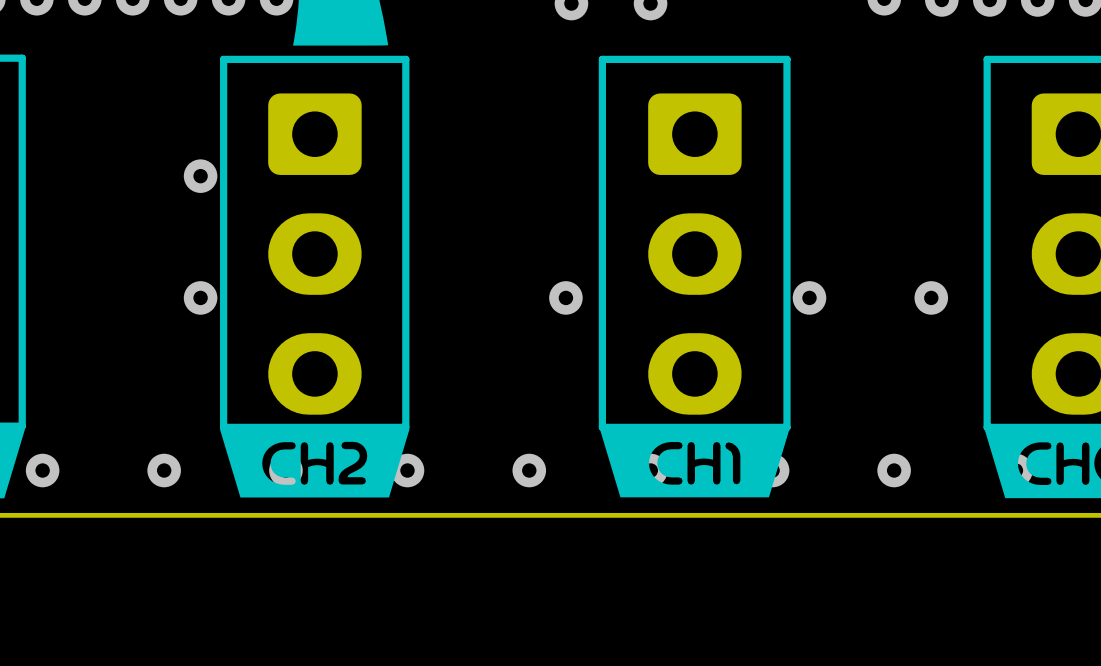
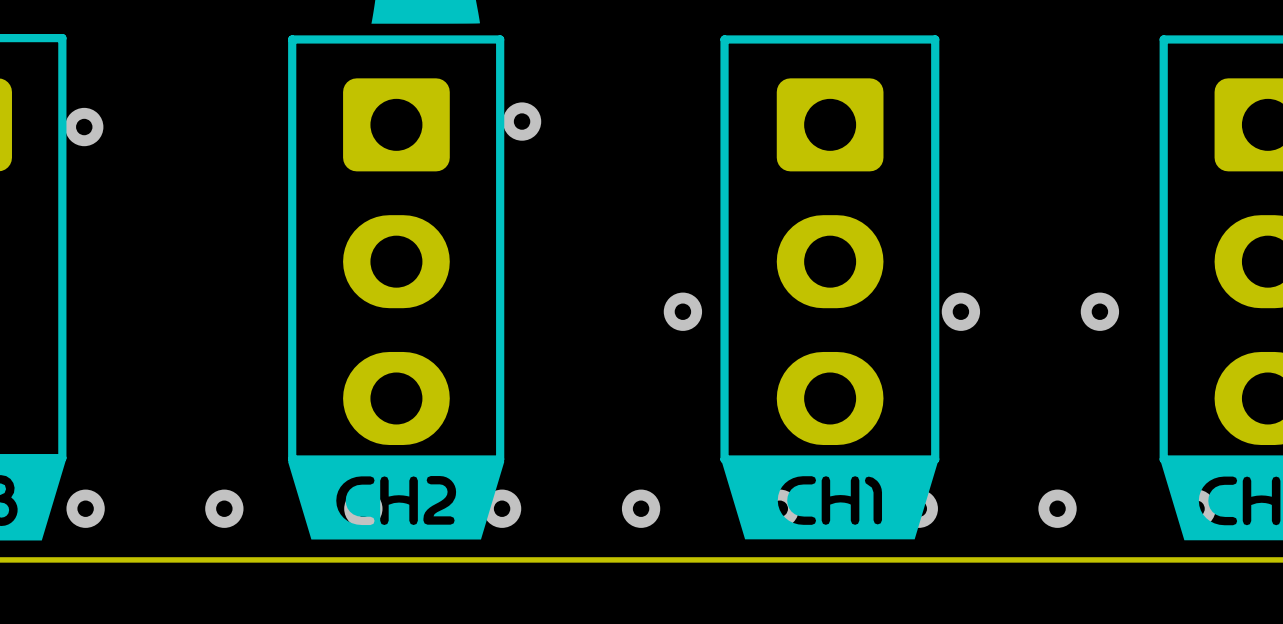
via: none -> (522, 121)
via: none -> (84, 127)
via: (200, 176) -> none
via: (200, 297) -> none

